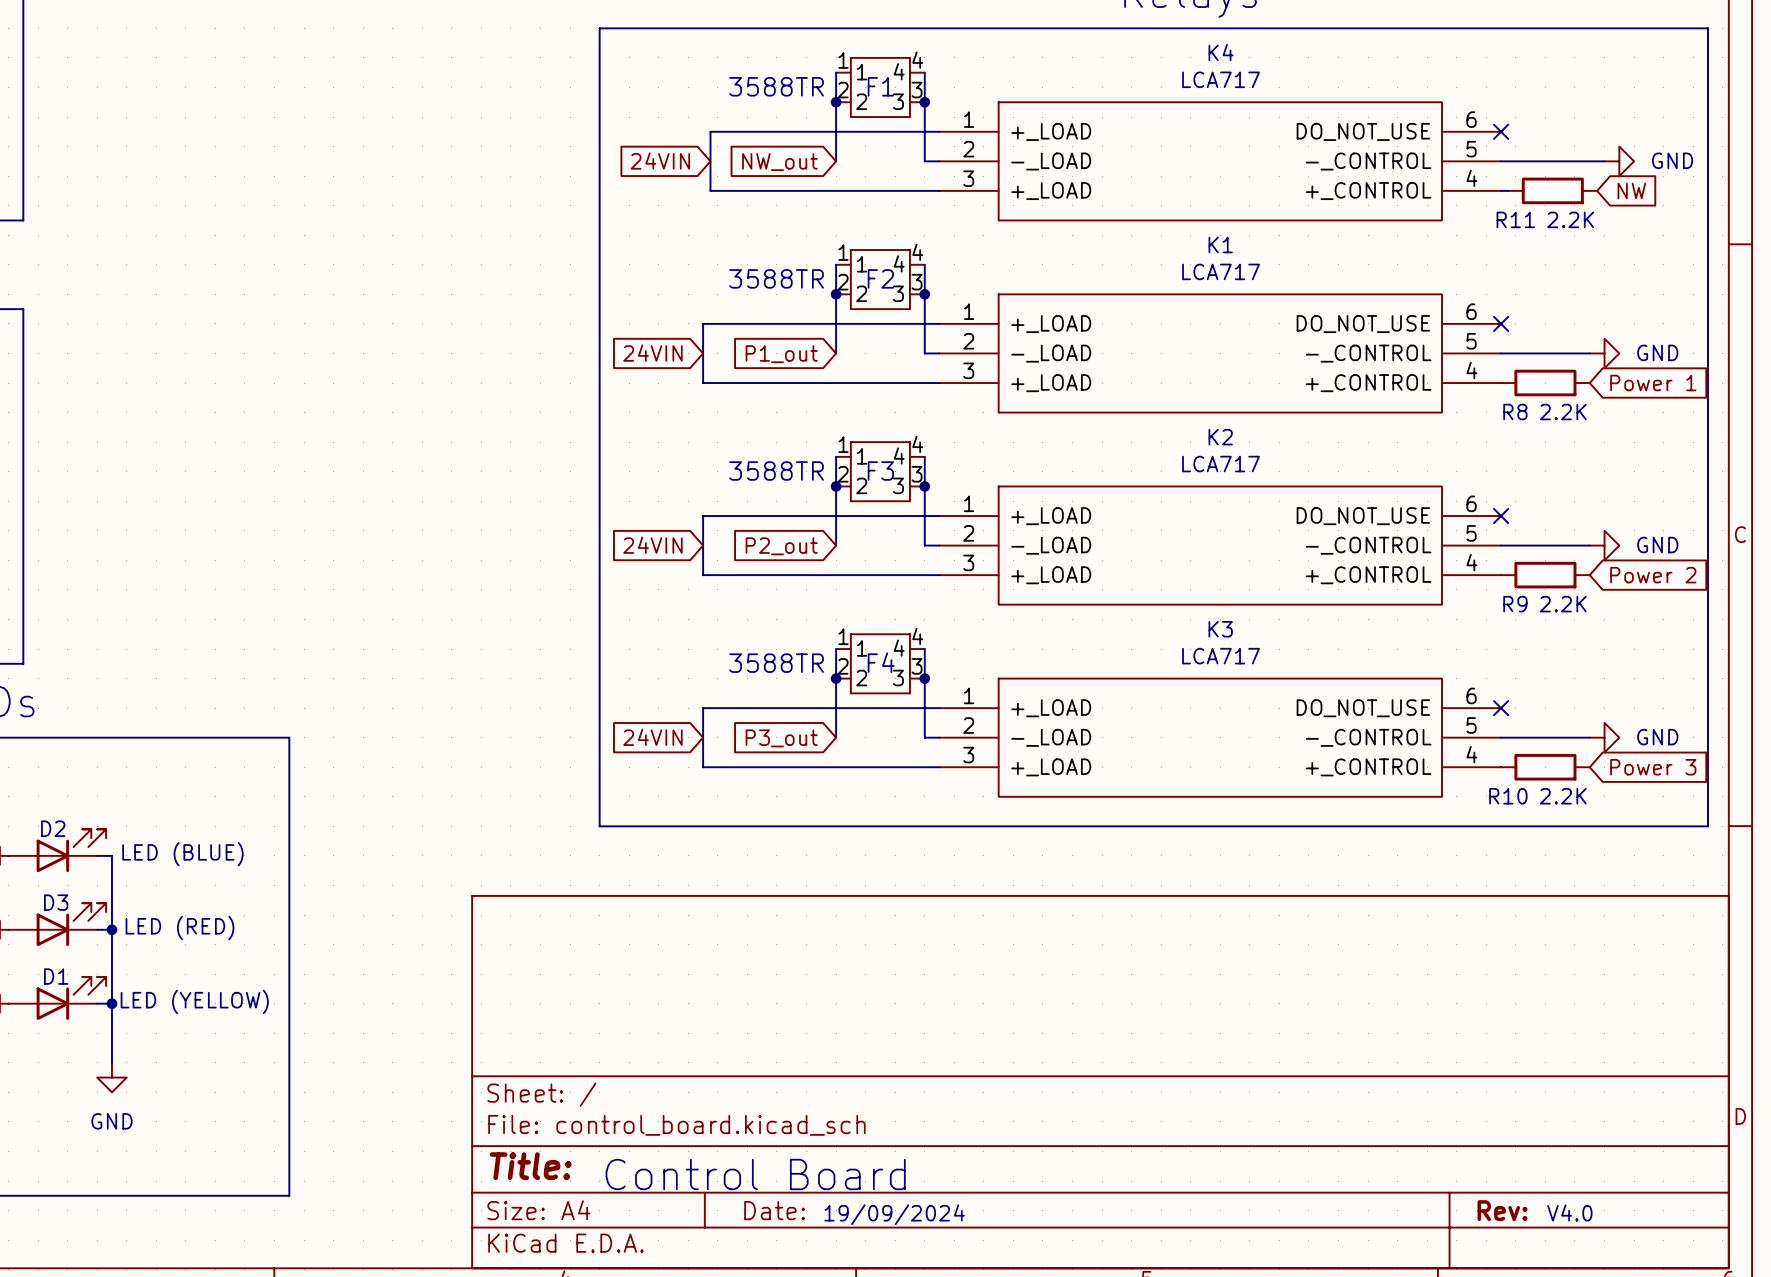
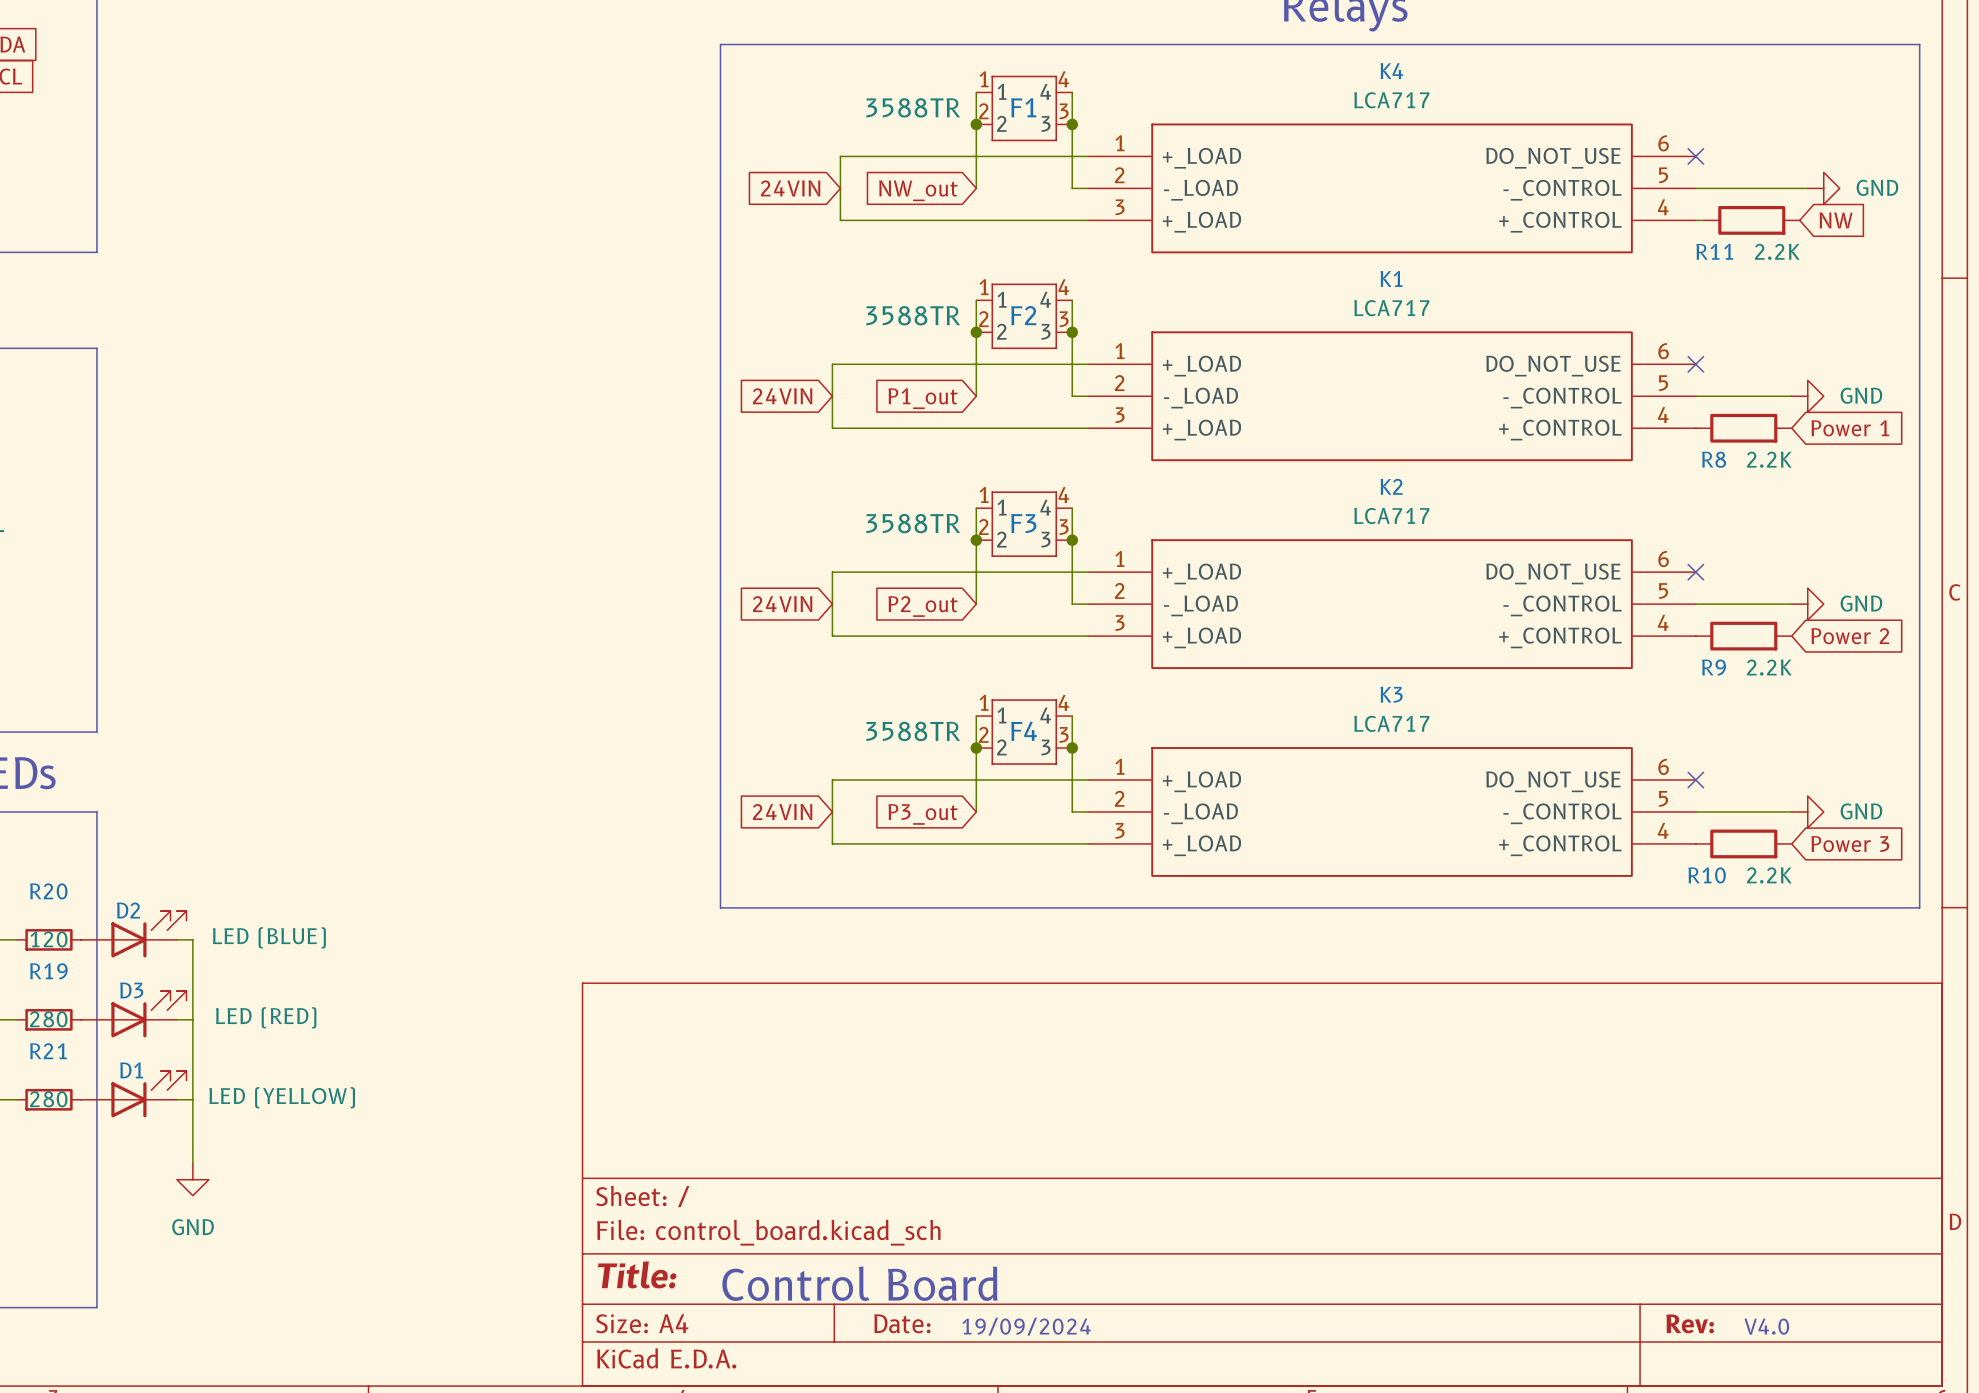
line: (23, 737) (289, 737) (289, 1195) (23, 1195) -> (96, 811) (96, 1307)
junction: (111, 929) -> none
junction: (111, 1003) -> none

